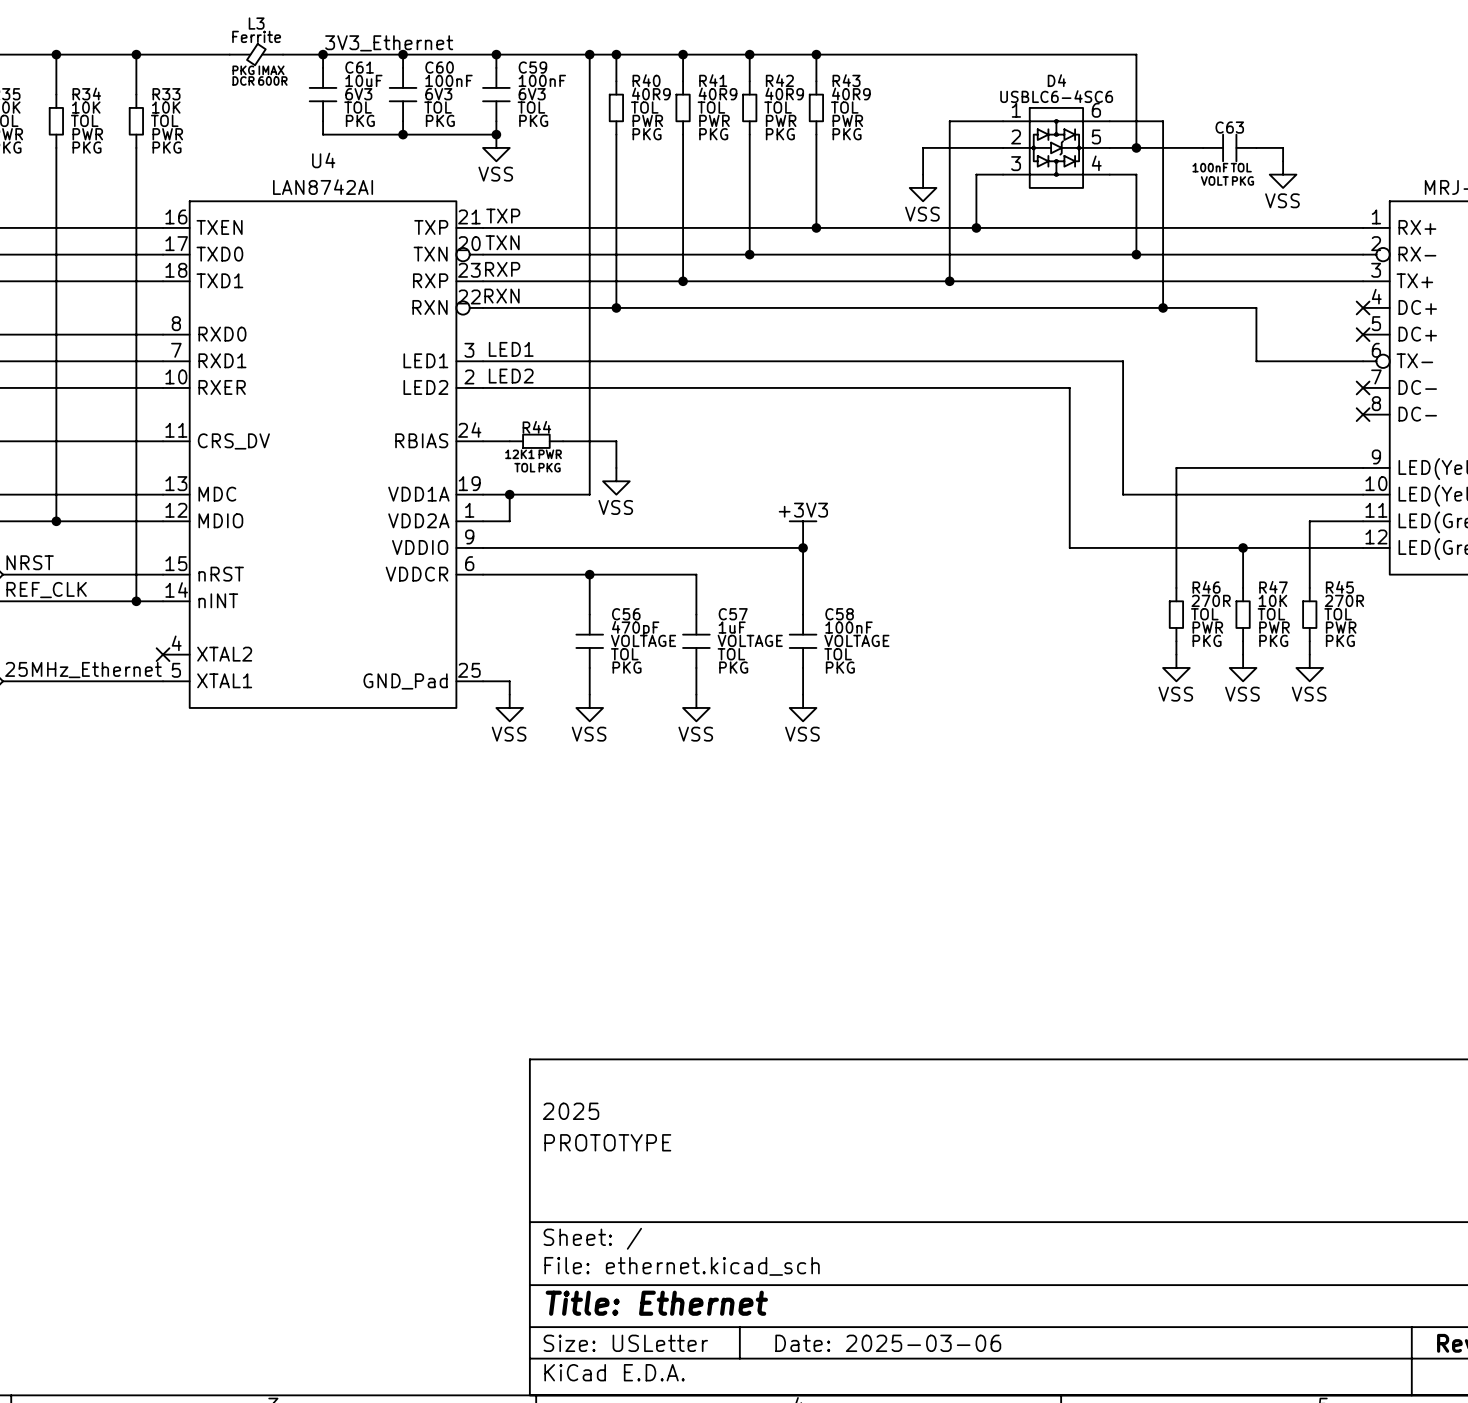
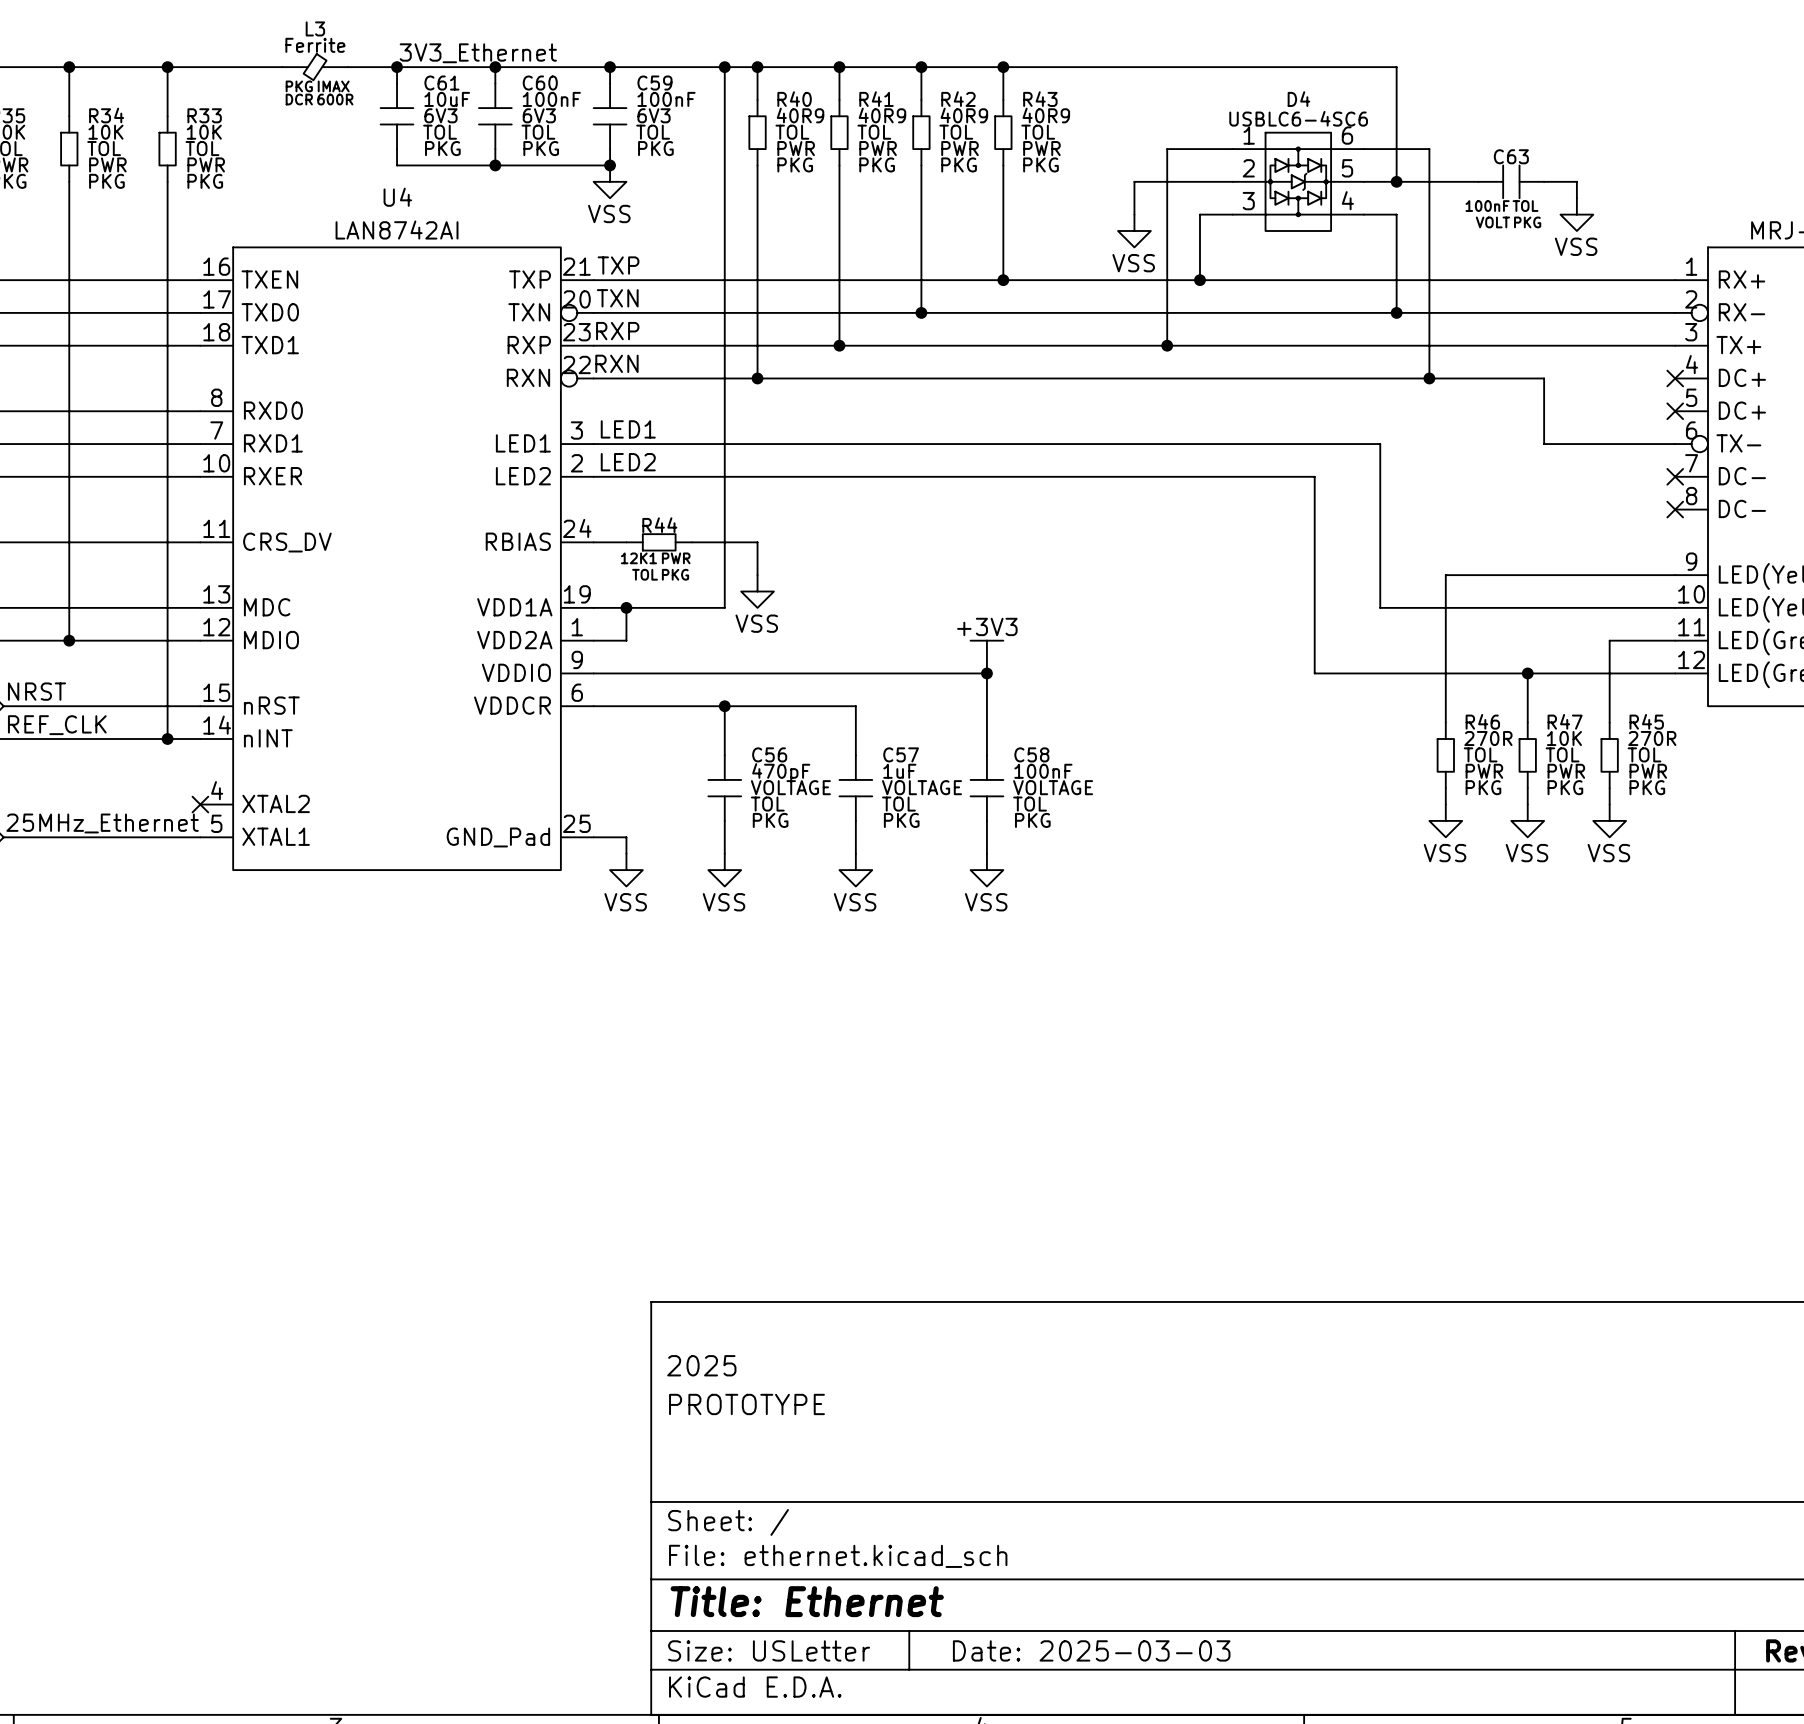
title block: Date: 2025-03-06 (888, 1343) -> Date: 2025-03-03 (1091, 1650)

